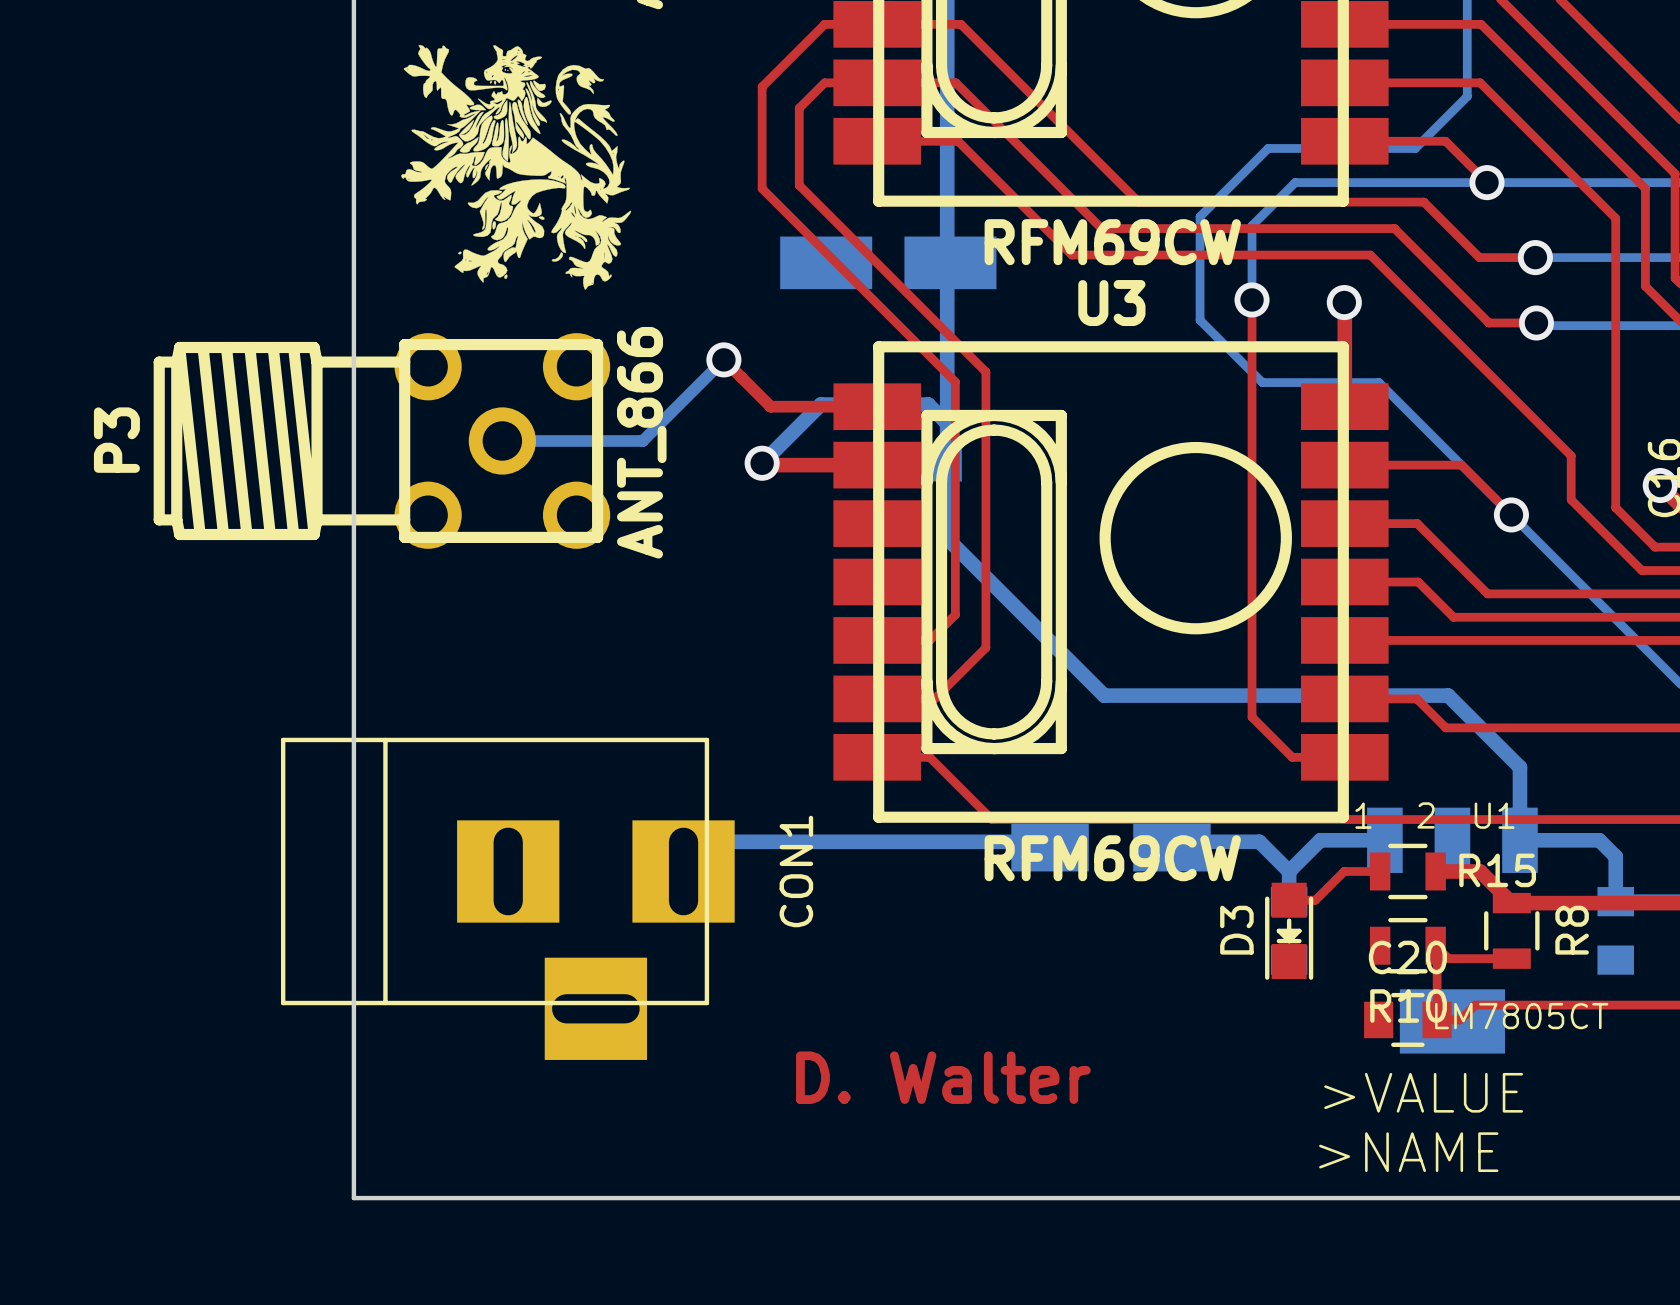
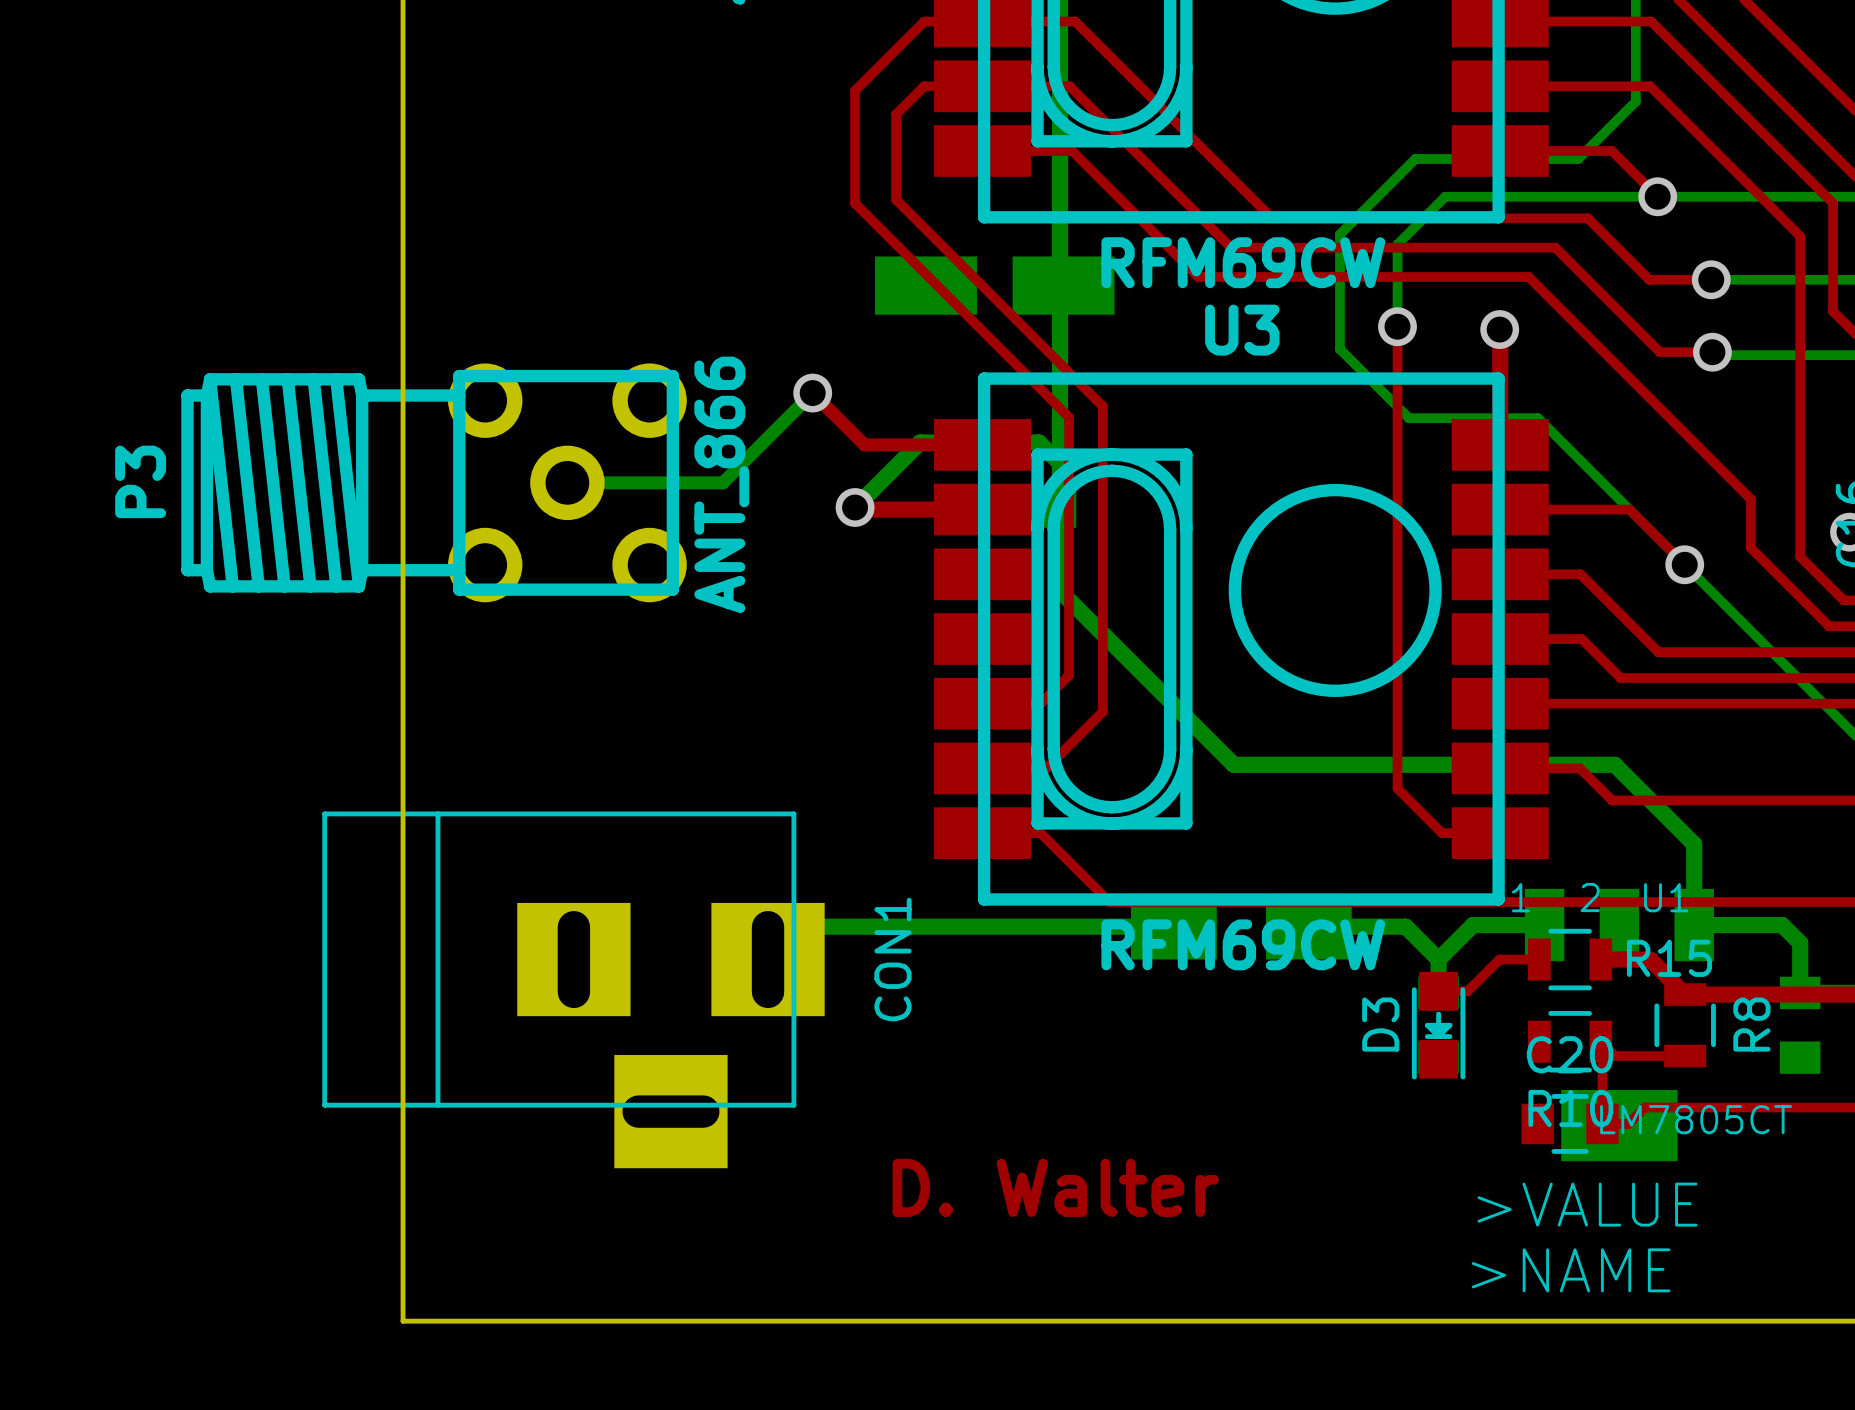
drawing: [401, 44, 632, 290] -> none

